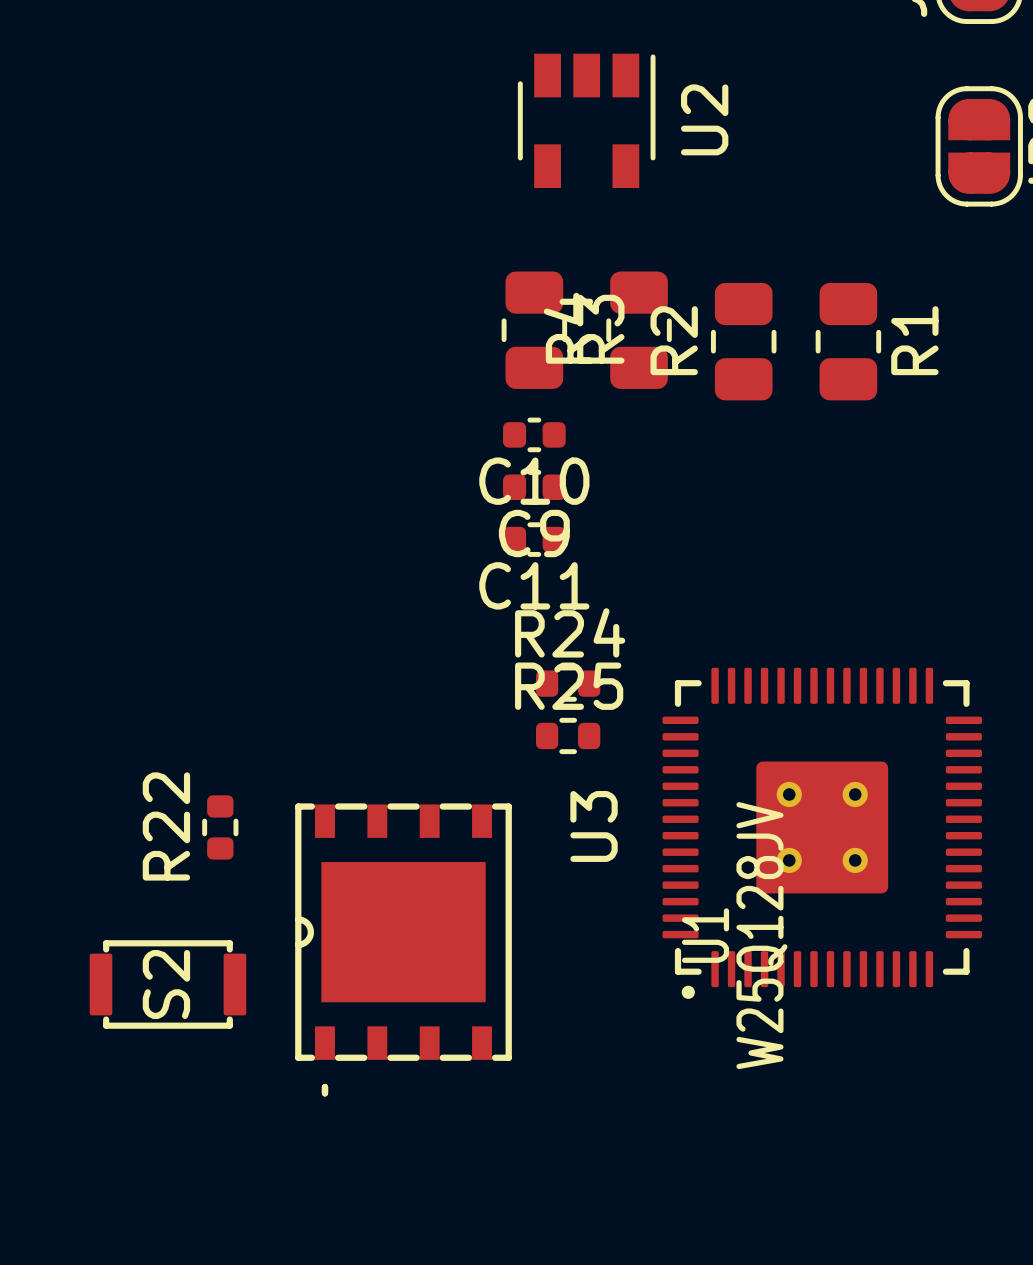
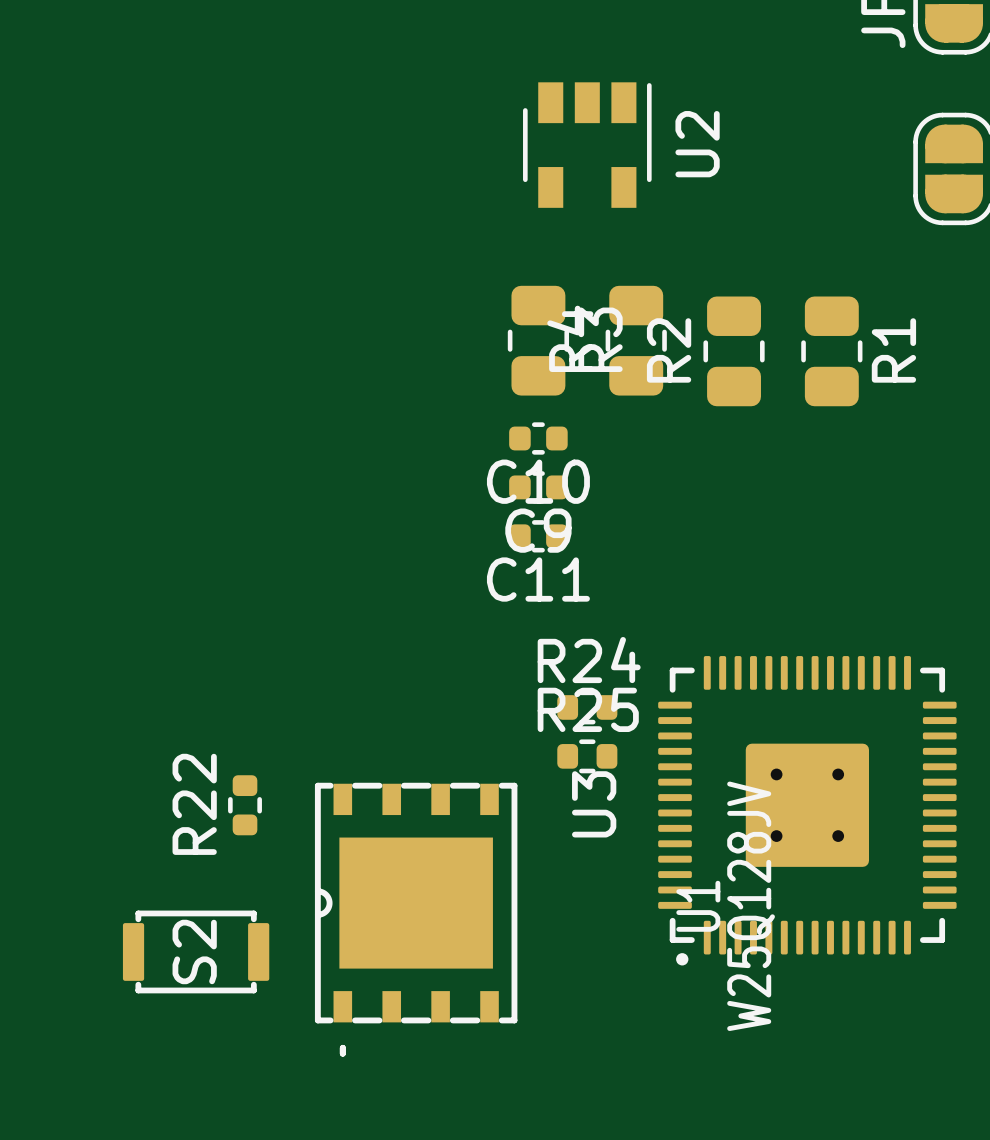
R24 position: (568, 683) -> (587, 707)
R25 position: (568, 735) -> (587, 756)

